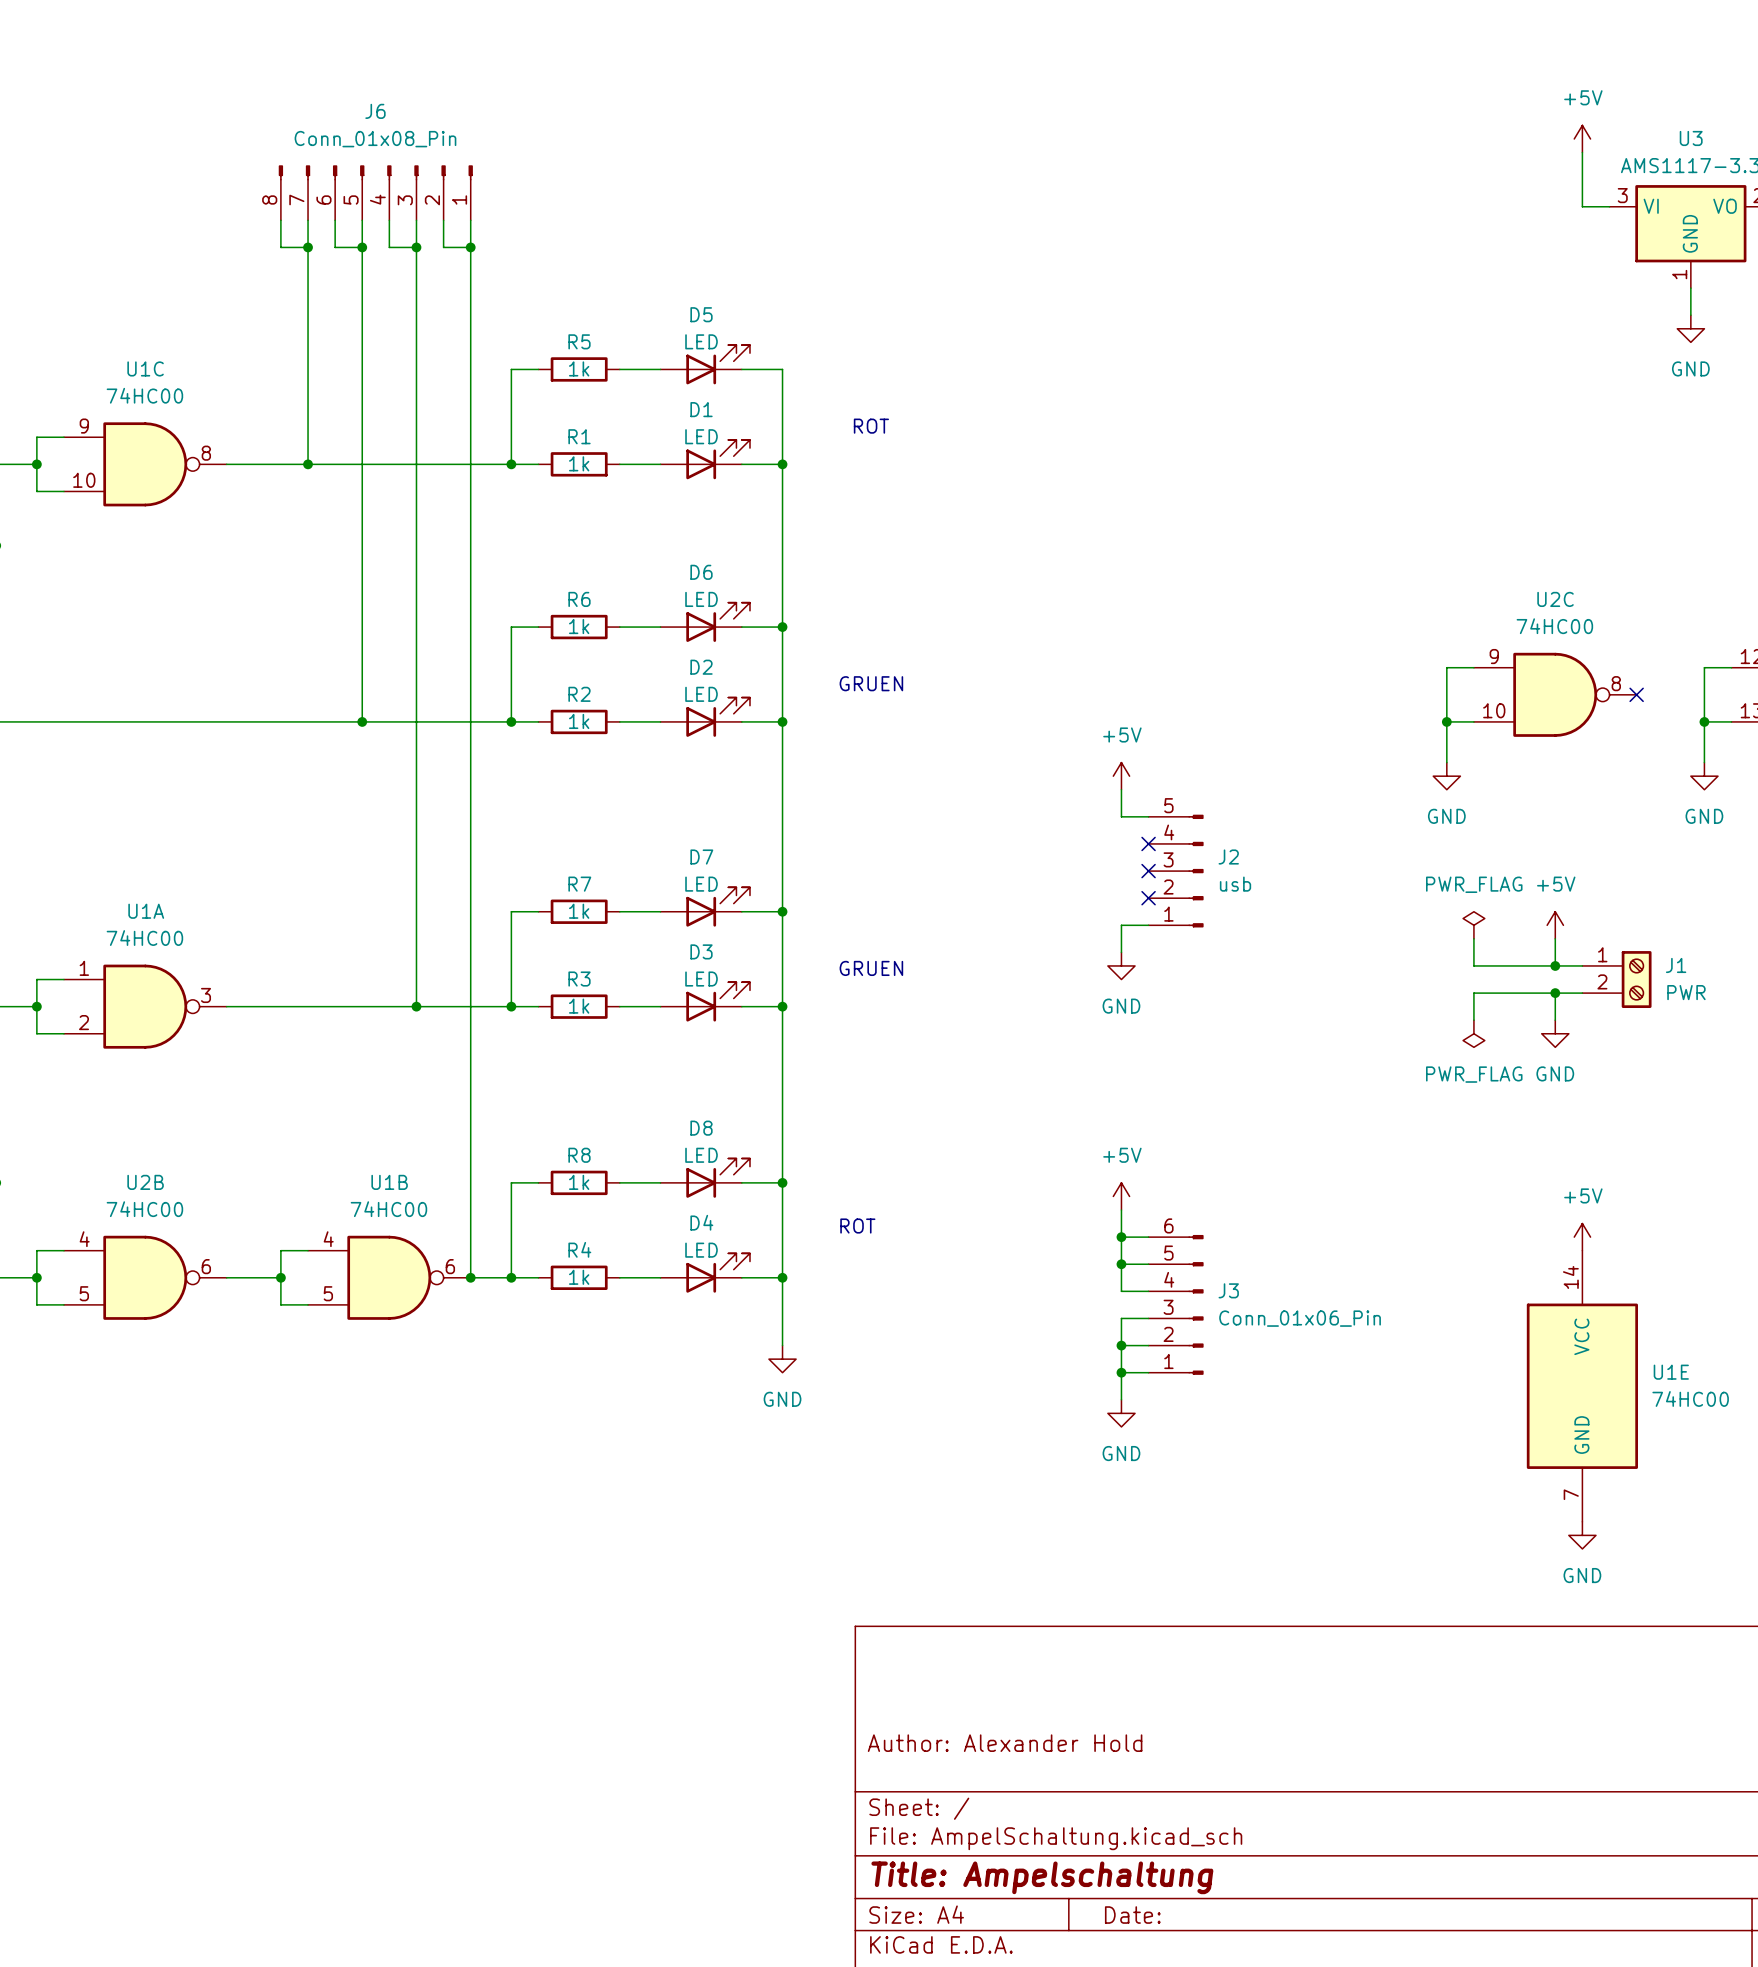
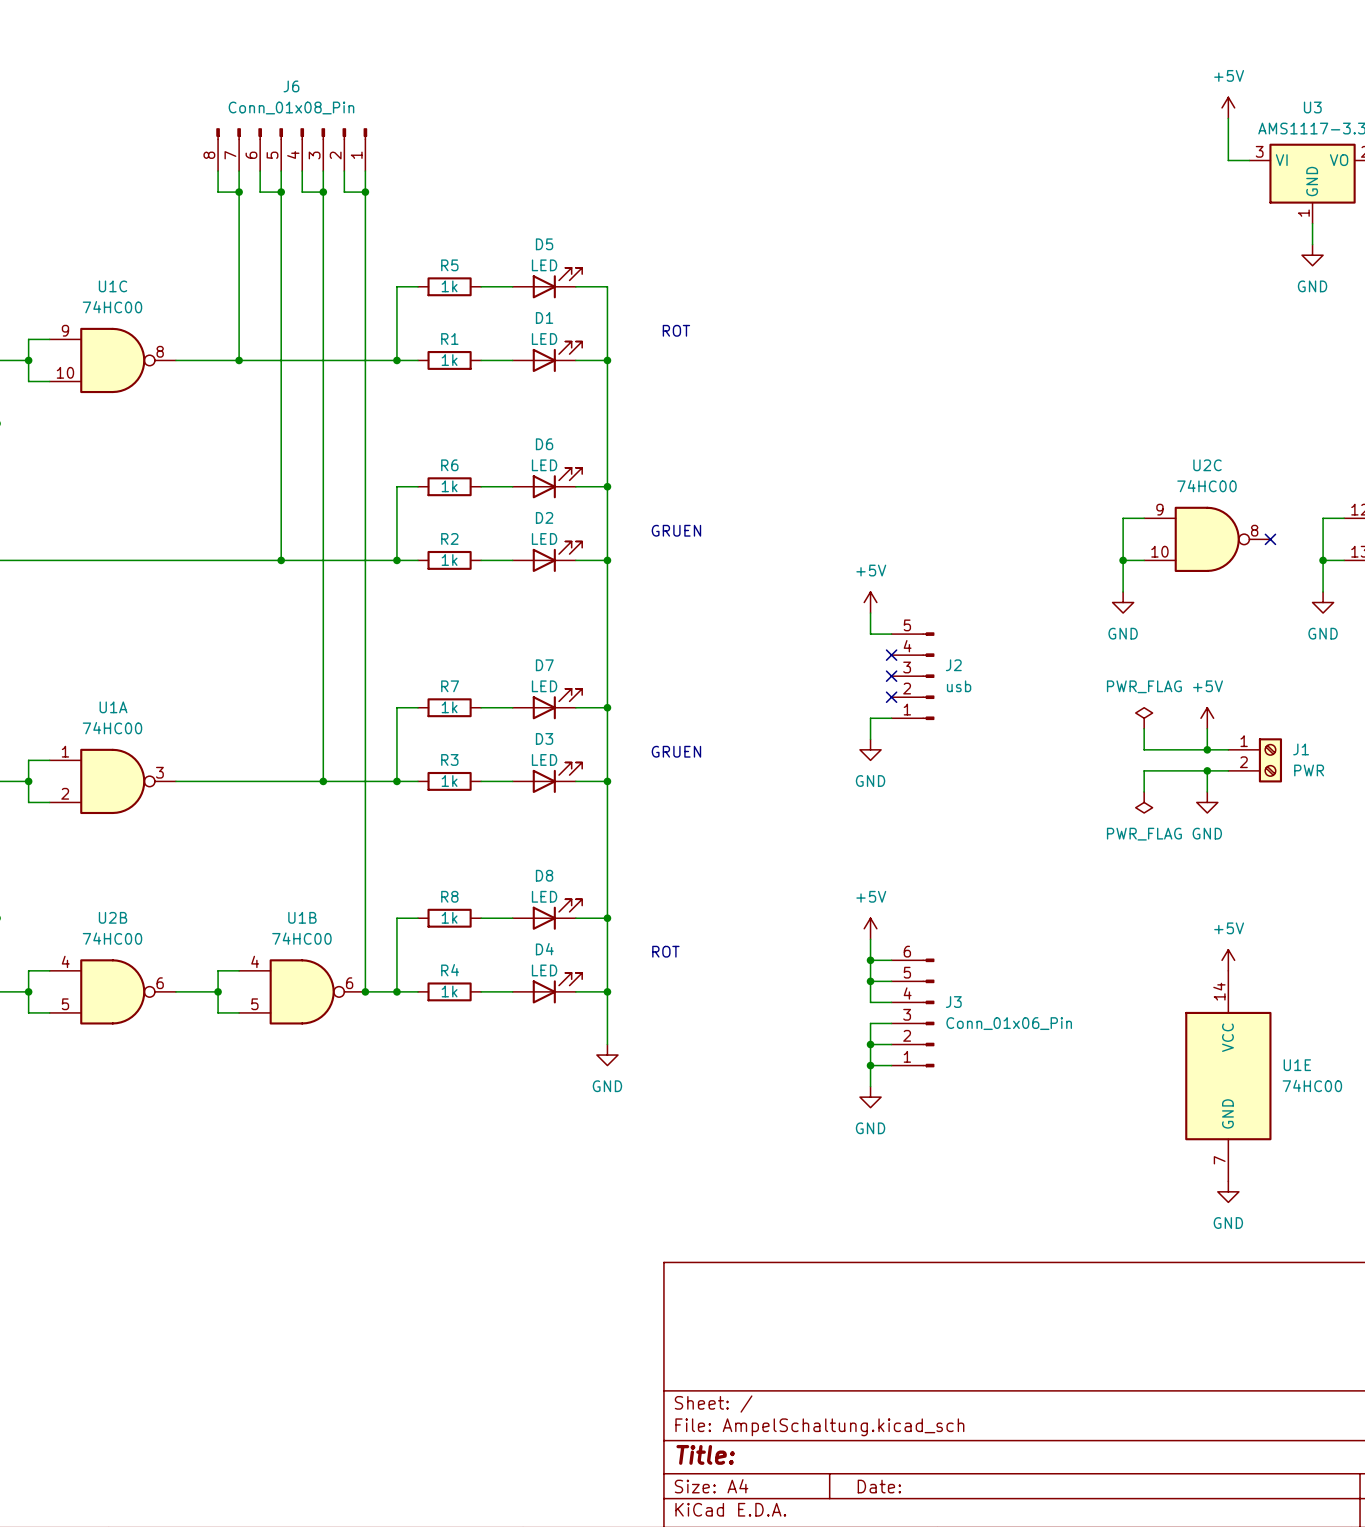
title block: Author: Alexander Hold (1005, 1743) -> none
title block: Title: Ampelschaltung (1042, 1877) -> Title: (705, 1454)

